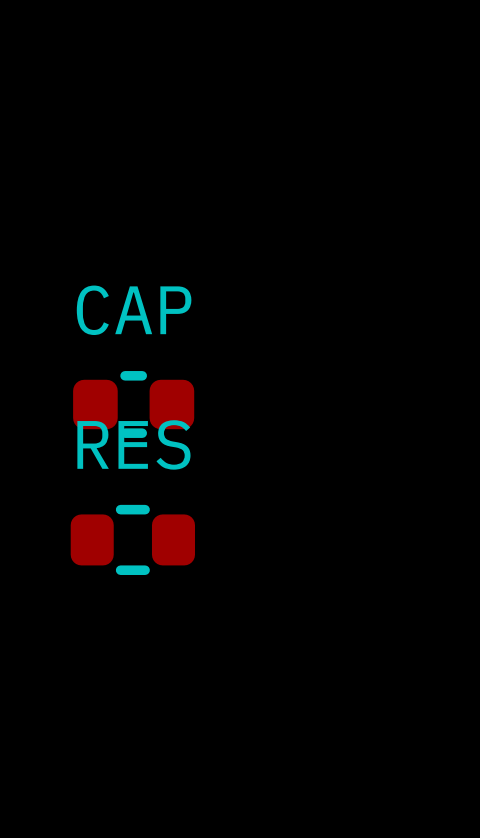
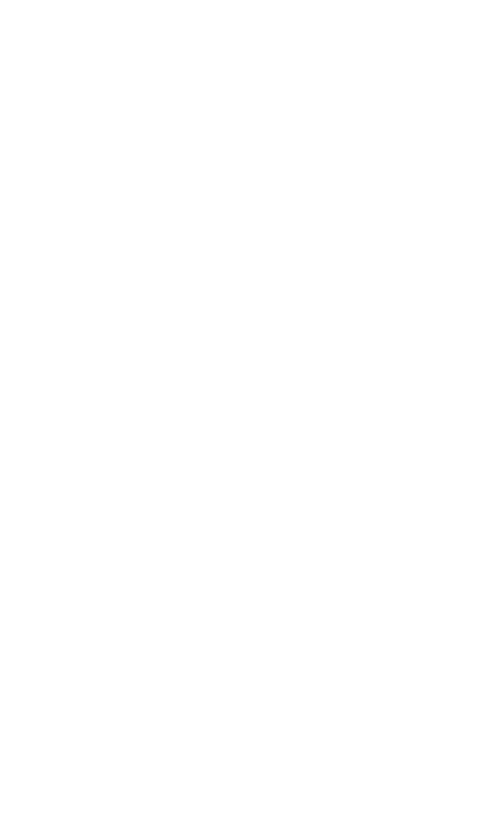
CAP: (133, 404) -> none
RES: (132, 539) -> none

